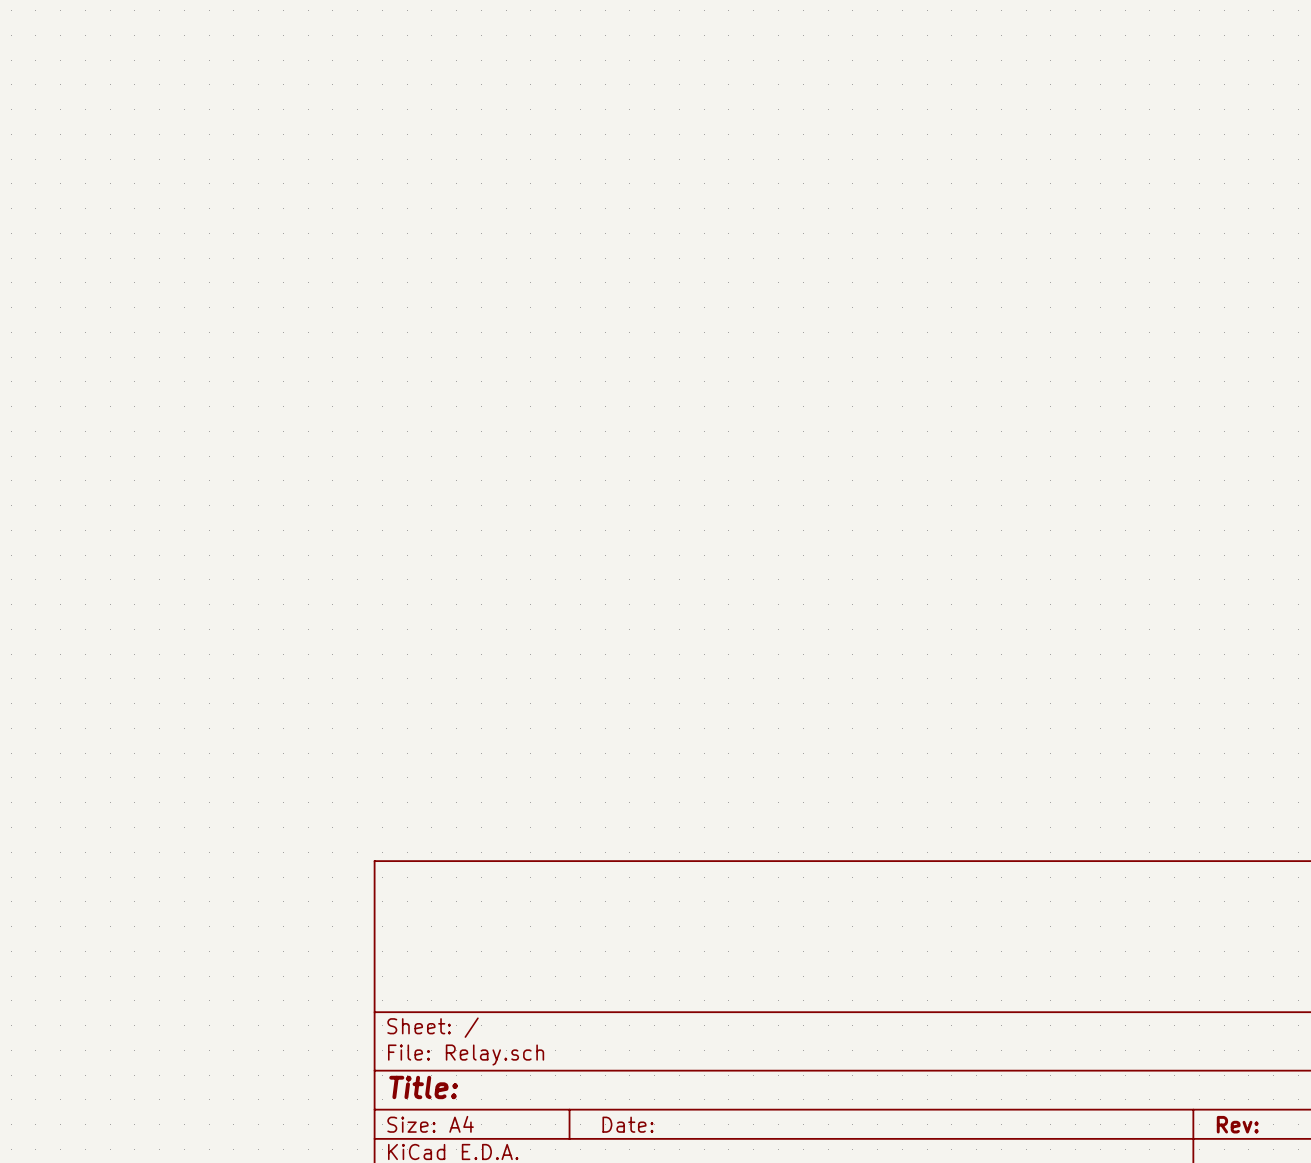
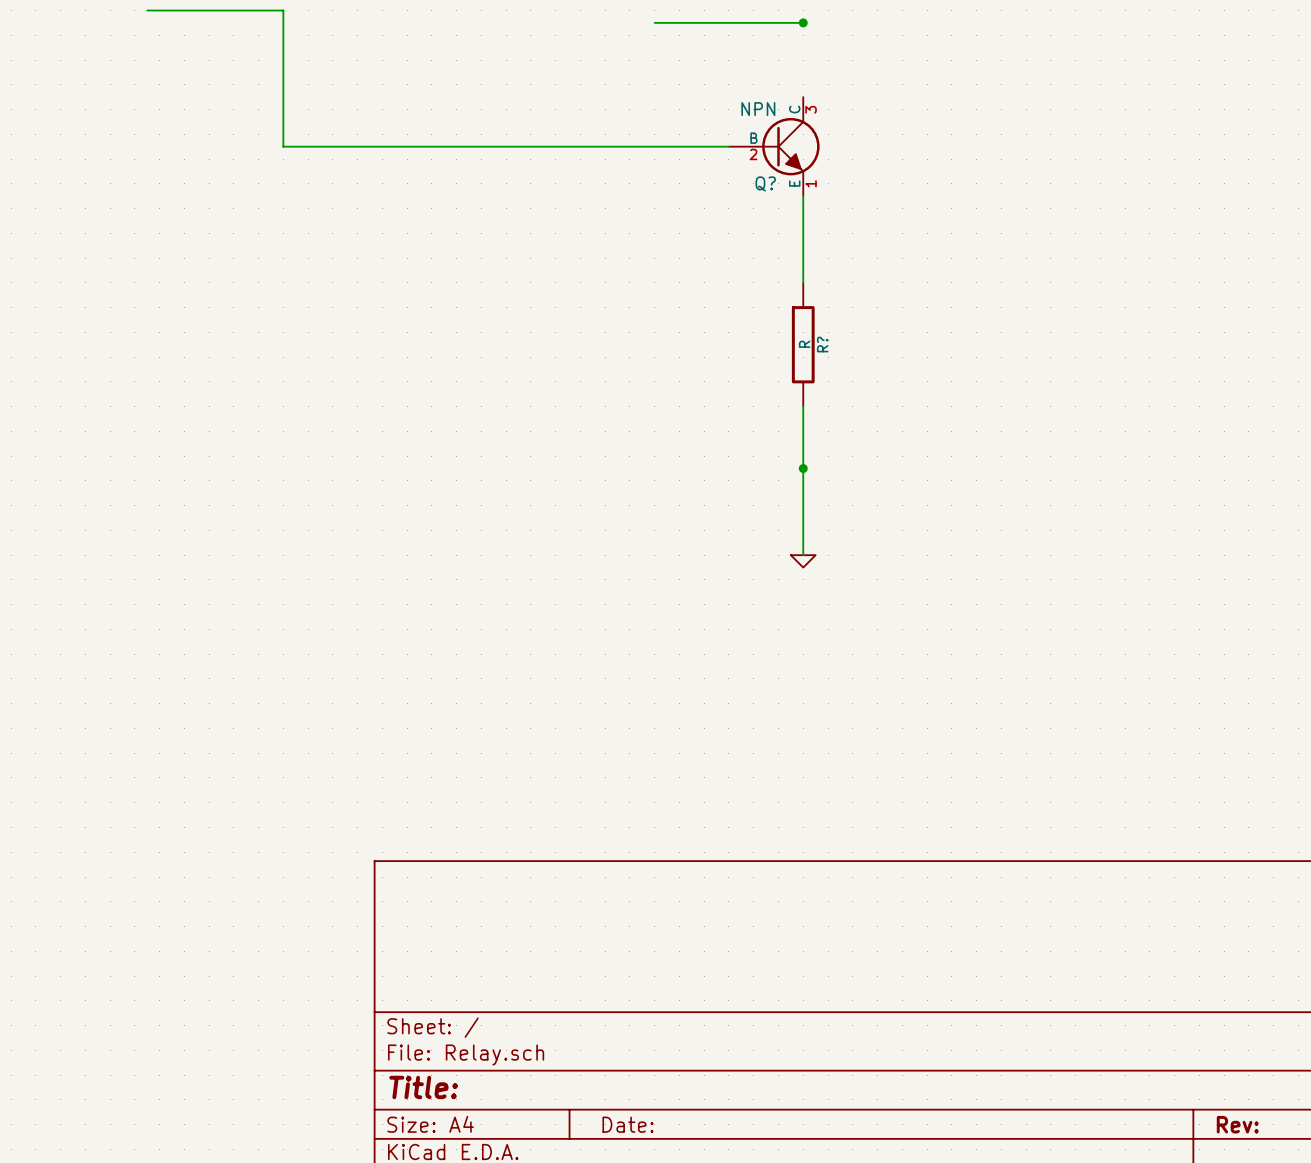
wire: none -> (147, 10) (283, 10) (283, 146) (728, 146)
wire: none -> (654, 22) (803, 22)
junction: none -> (803, 22)
Q?: none -> NPN (774, 146)
wire: none -> (803, 196) (803, 282)
R?: none -> R (803, 344)
wire: none -> (803, 406) (803, 555)
junction: none -> (803, 468)
power symbol: none -> (803, 561)

